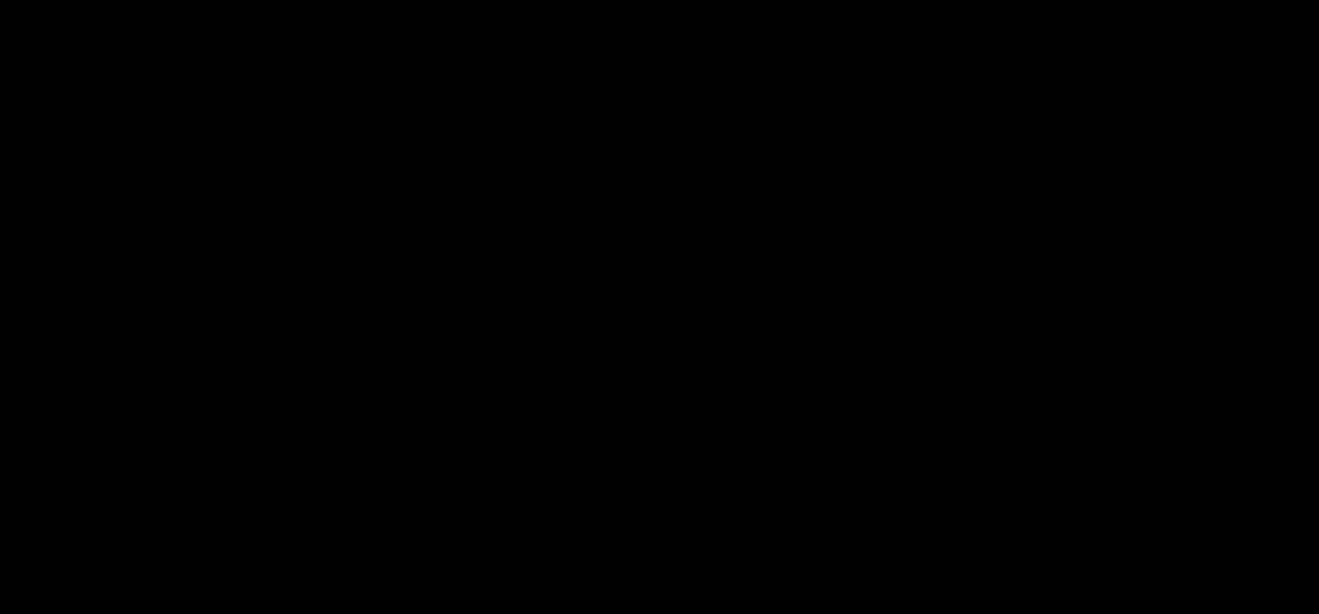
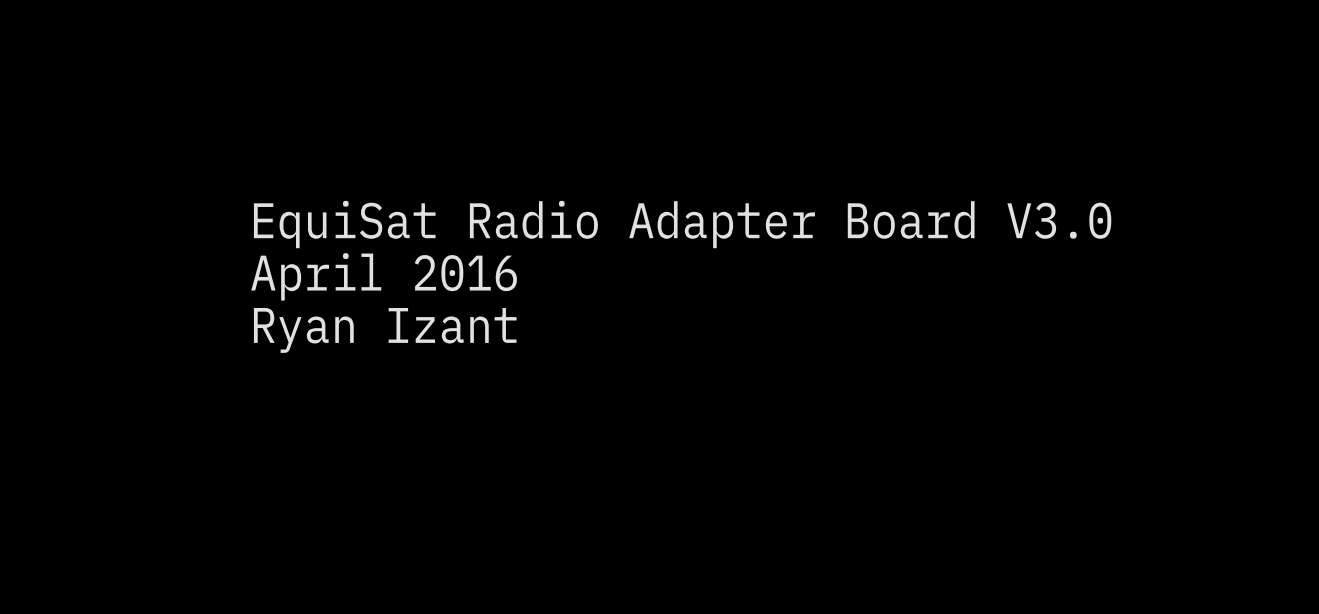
text: none -> EquiSat Radio Adapter Board V3.0 (682, 224)
text: none -> April 2016 (384, 276)
text: none -> Ryan Izant (385, 330)

